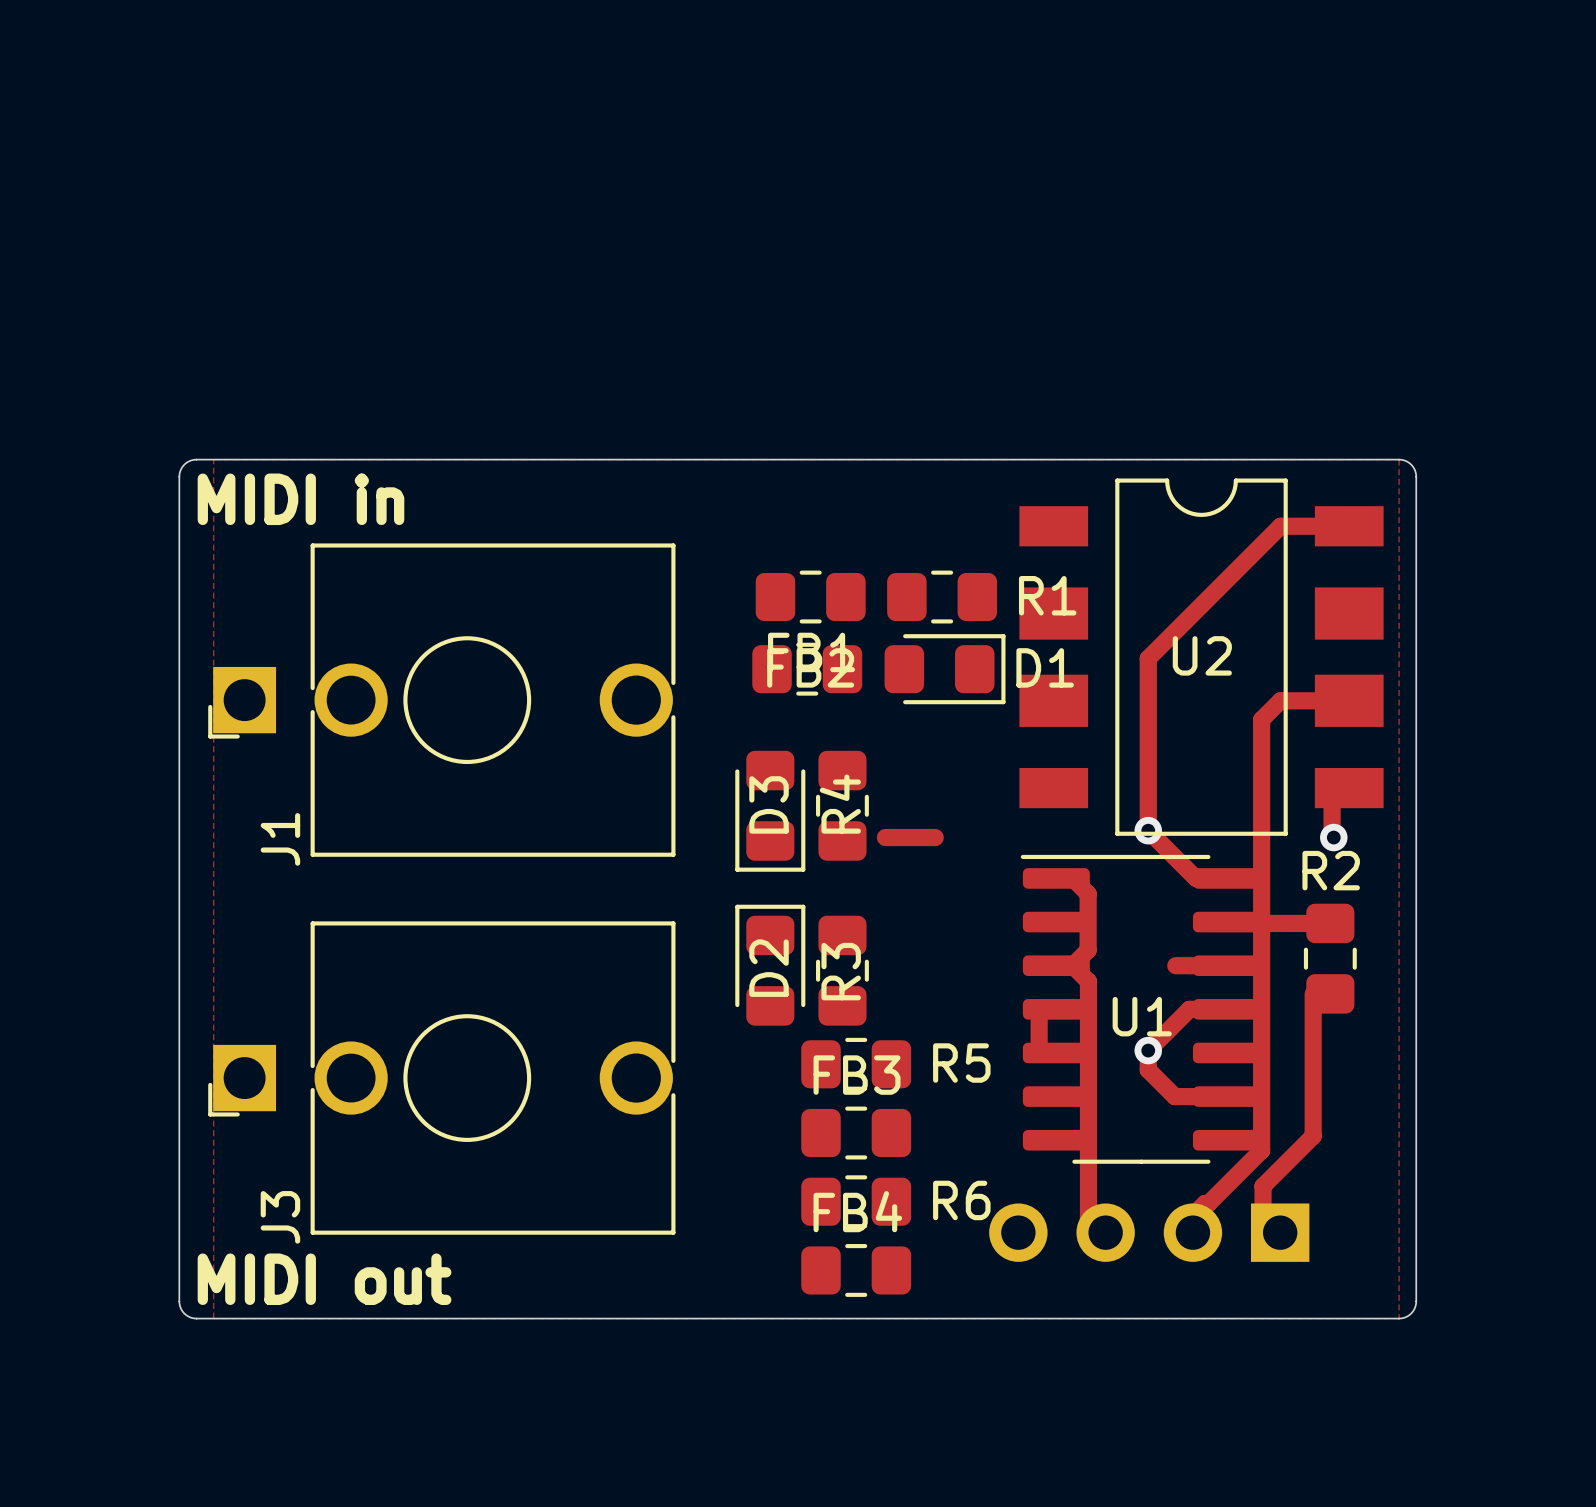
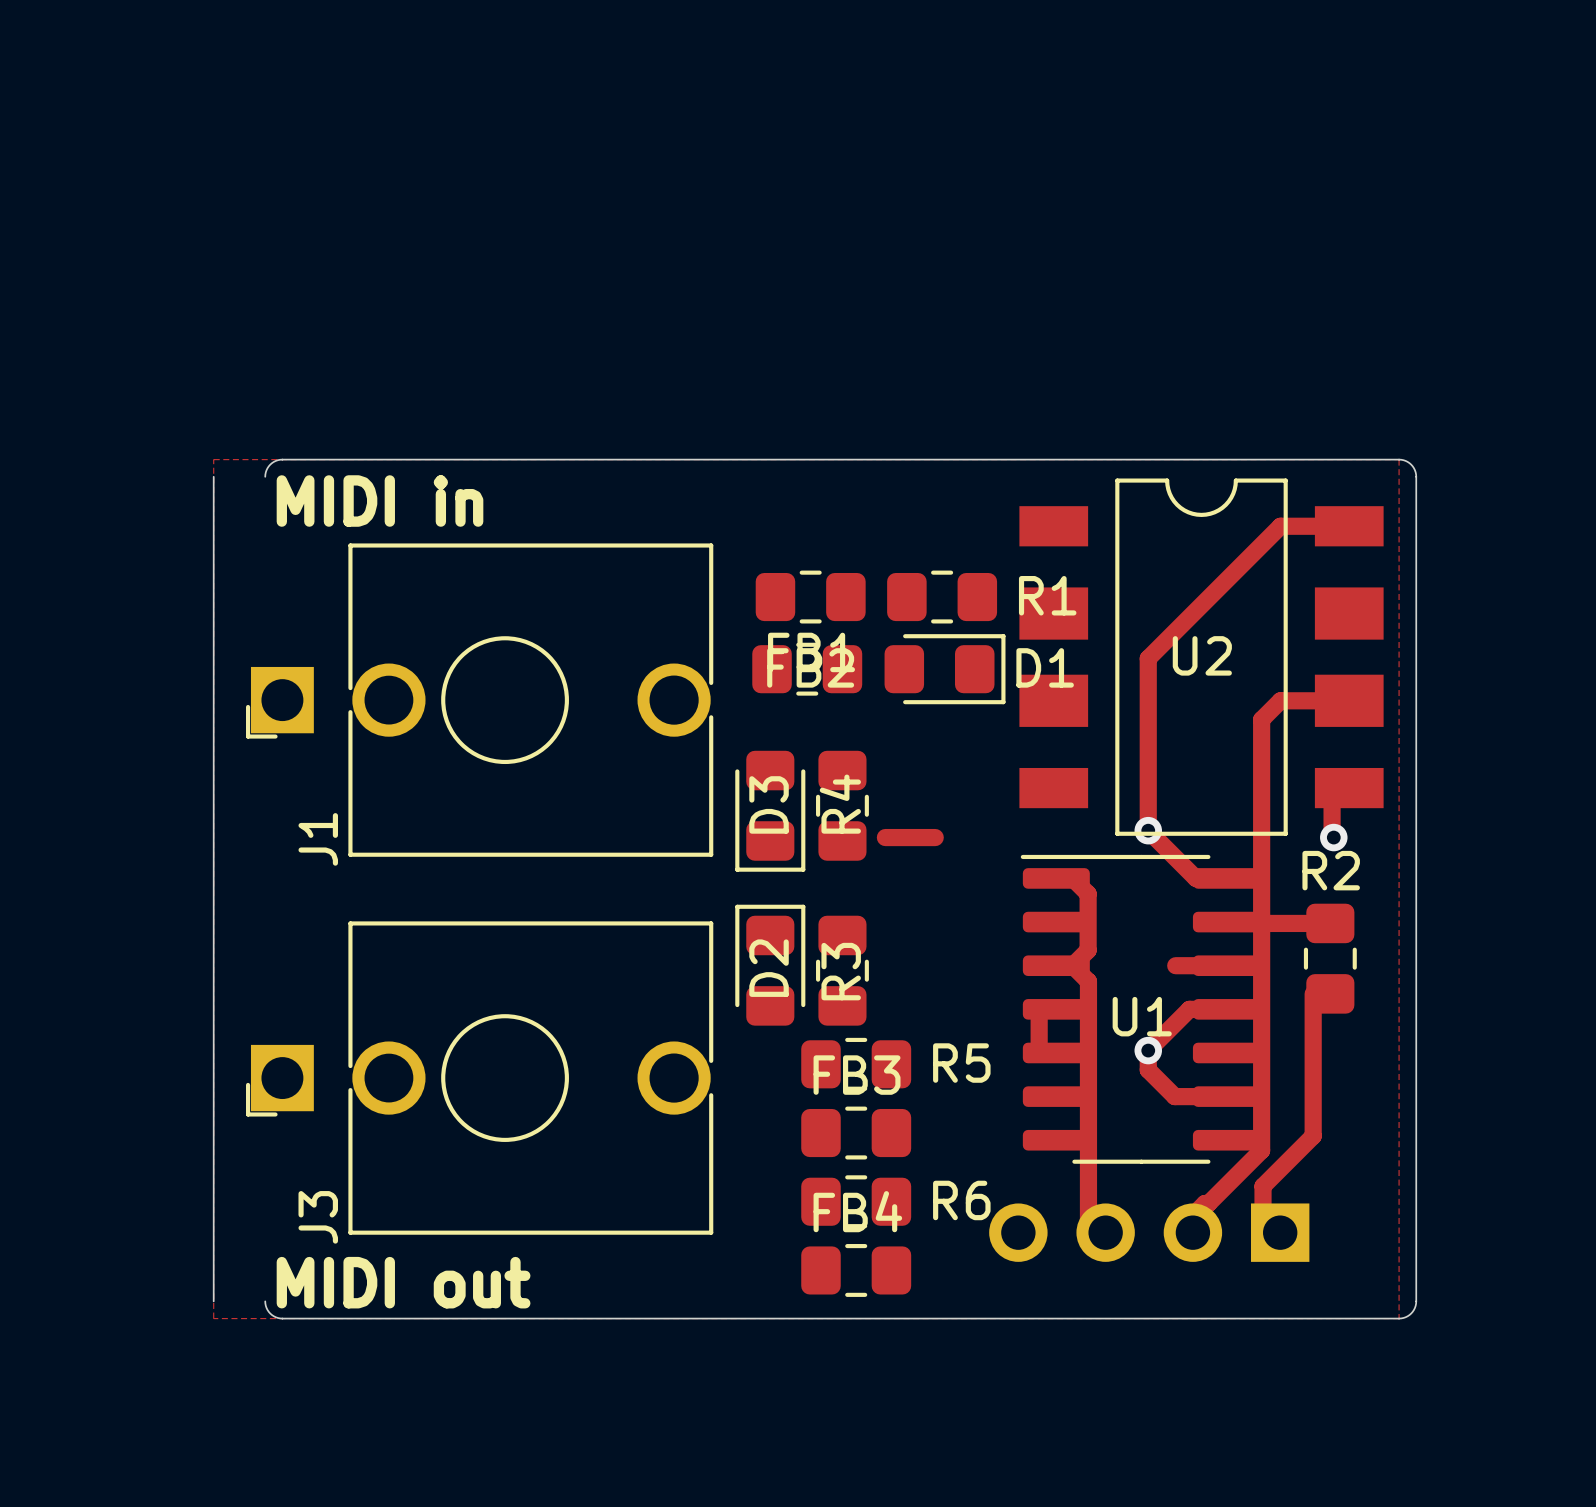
board edge: (282, 459) (194, 459) (182, 466) (179, 476) (179, 1303) (184, 1313) (194, 1318) (282, 1318) -> (282, 459) (270, 464) (265, 476)
board edge: none -> (213, 476) (213, 1301)
text position: MIDI in (300, 499) -> MIDI in (380, 501)
J1 position: (441, 700) -> (479, 700)
J3 position: (441, 1078) -> (479, 1078)
text position: MIDI out (324, 1279) -> MIDI out (403, 1282)
board edge: none -> (265, 1301) (270, 1313) (282, 1318)

